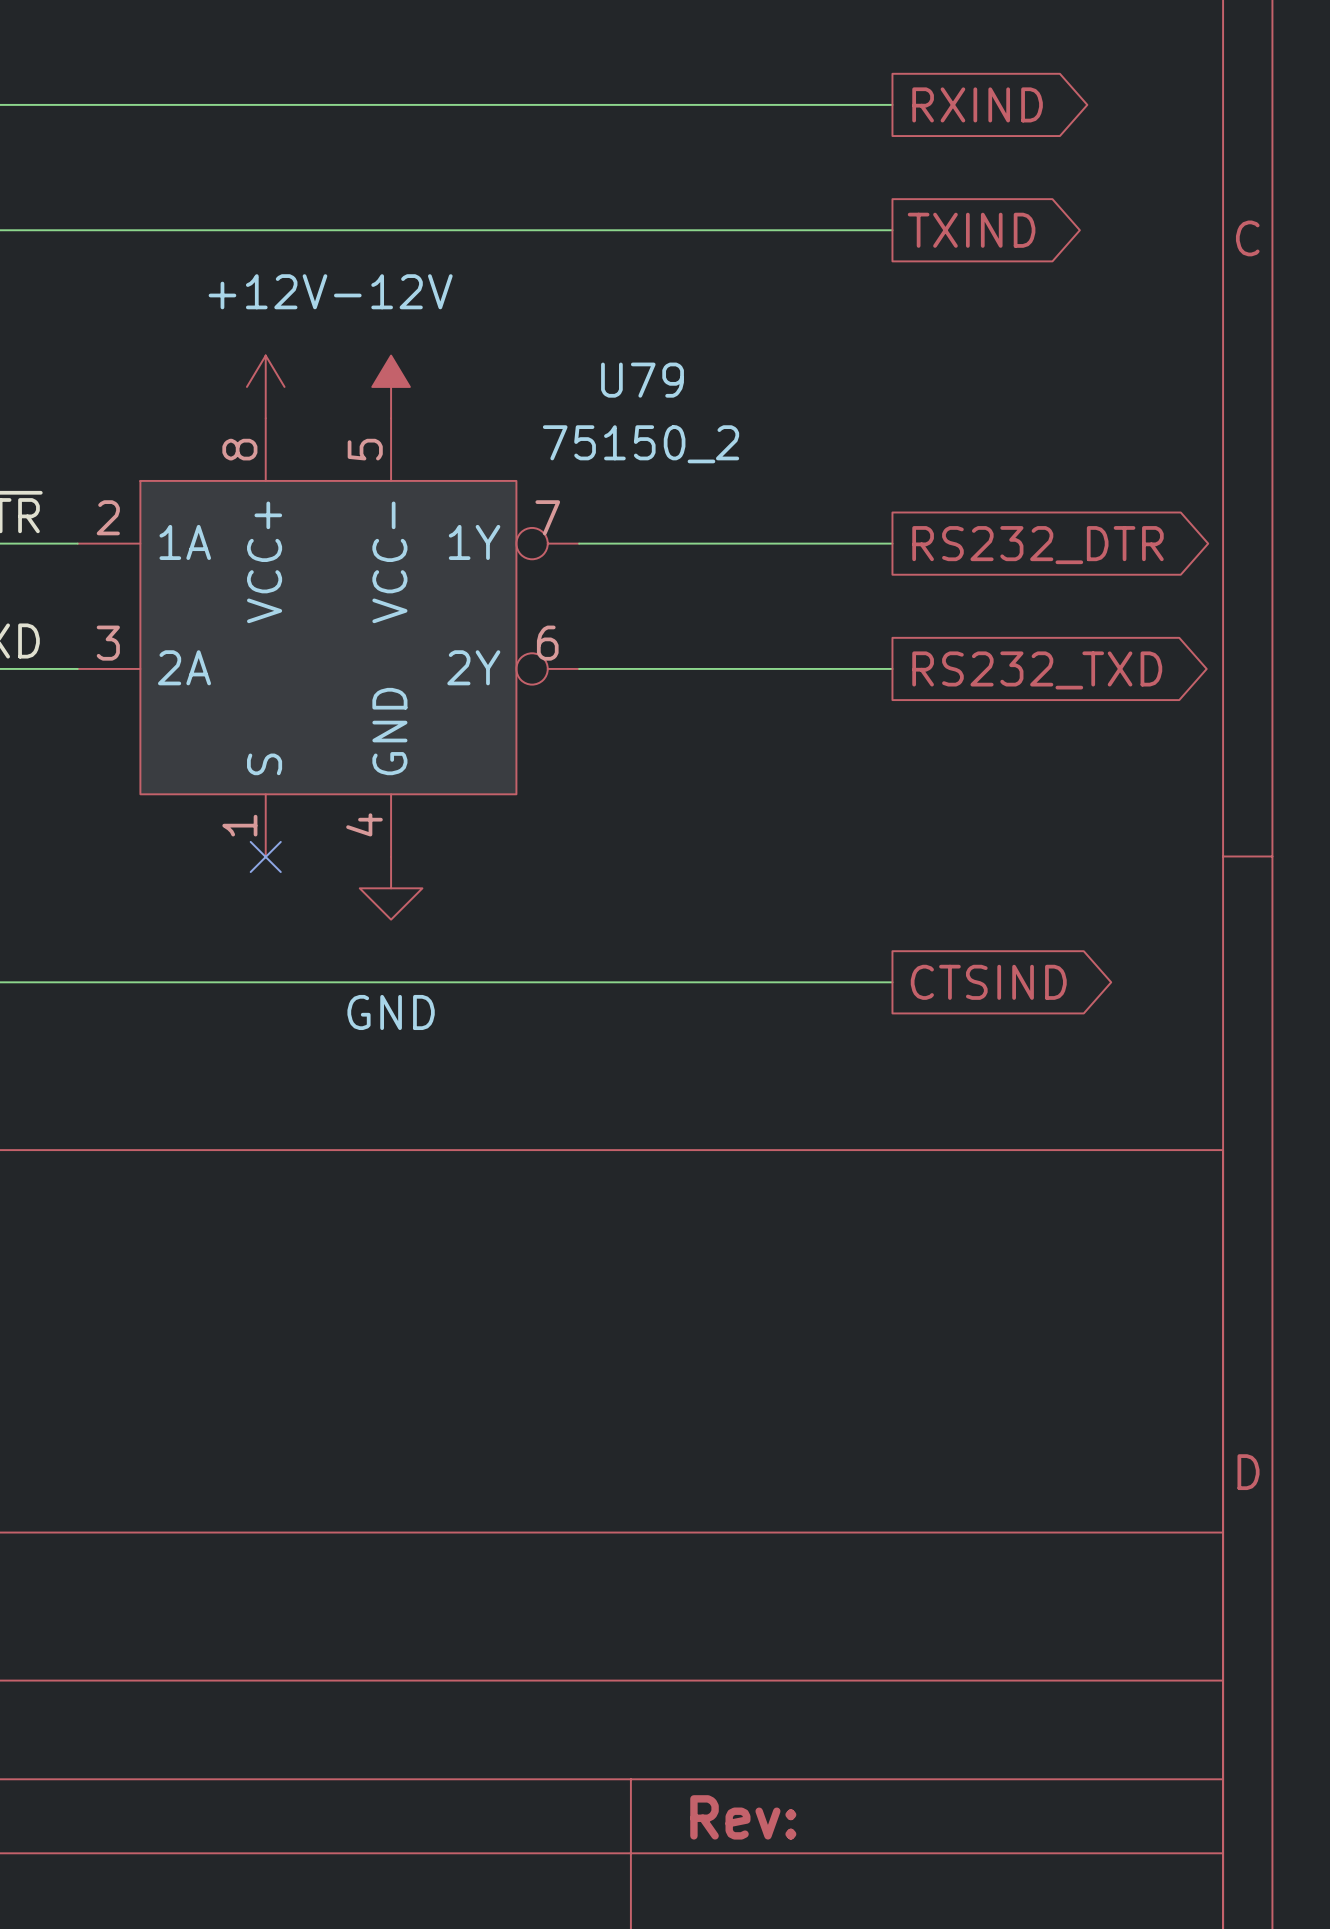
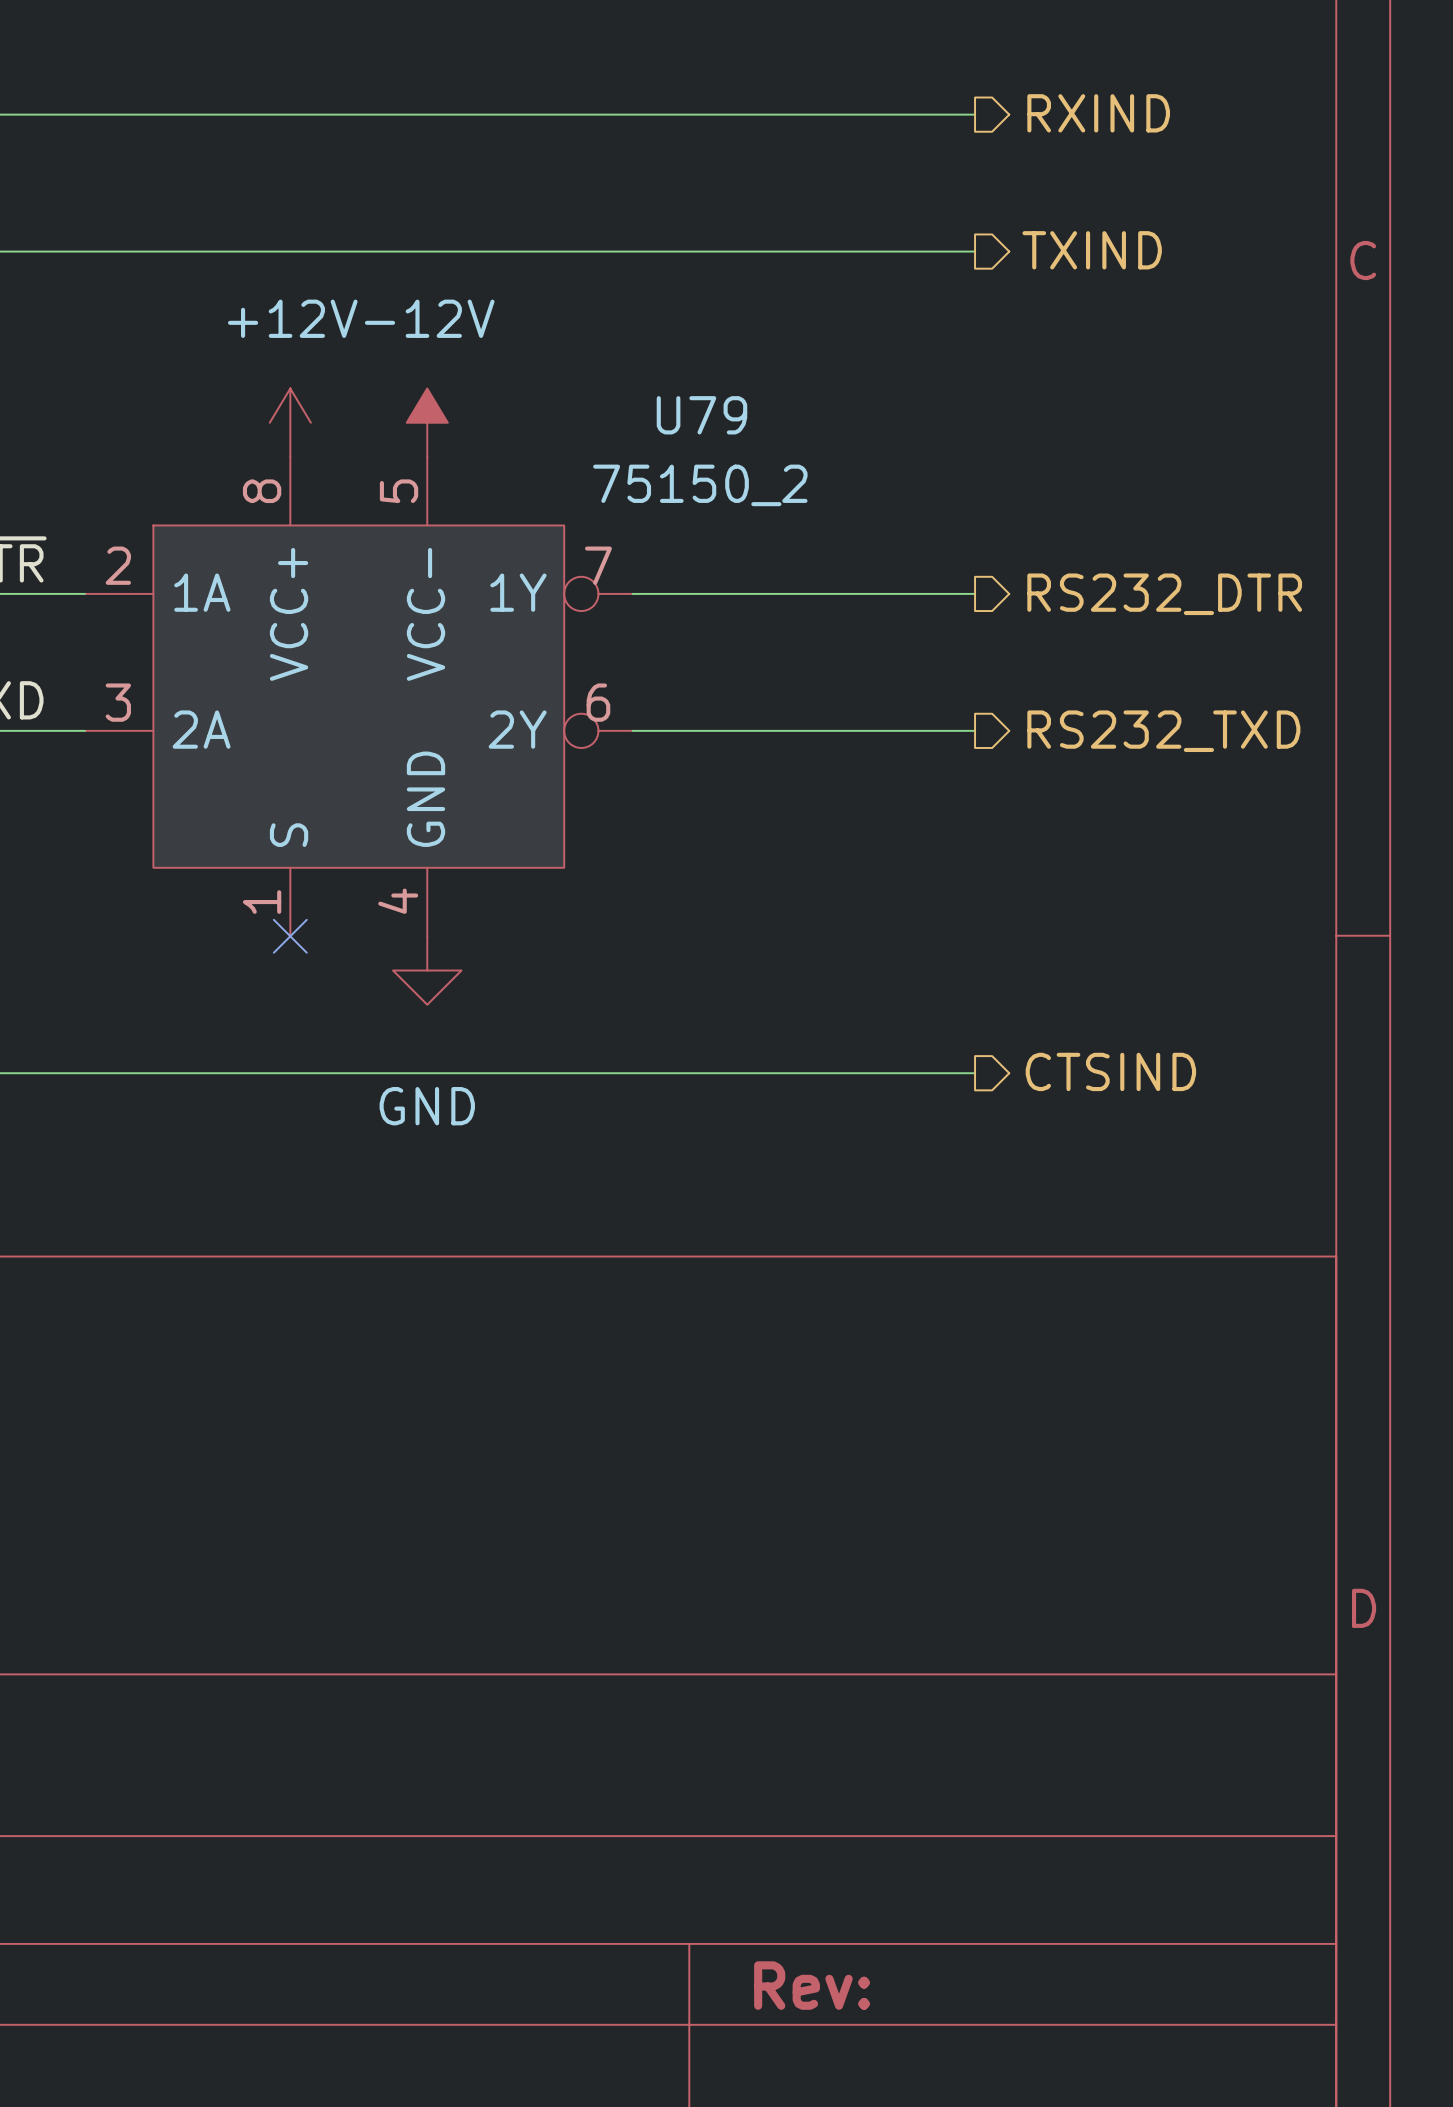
hierarchical label: none -> RXIND (1098, 113)
global label: RXIND (977, 104) -> none
hierarchical label: none -> TXIND (1092, 250)
global label: TXIND (971, 230) -> none
hierarchical label: none -> RS232_DTR (1164, 594)
global label: RS232_DTR (1037, 545) -> none
hierarchical label: none -> RS232_TXD (1163, 731)
global label: RS232_TXD (1037, 670) -> none
hierarchical label: none -> CTSIND (1110, 1071)
global label: CTSIND (988, 982) -> none

